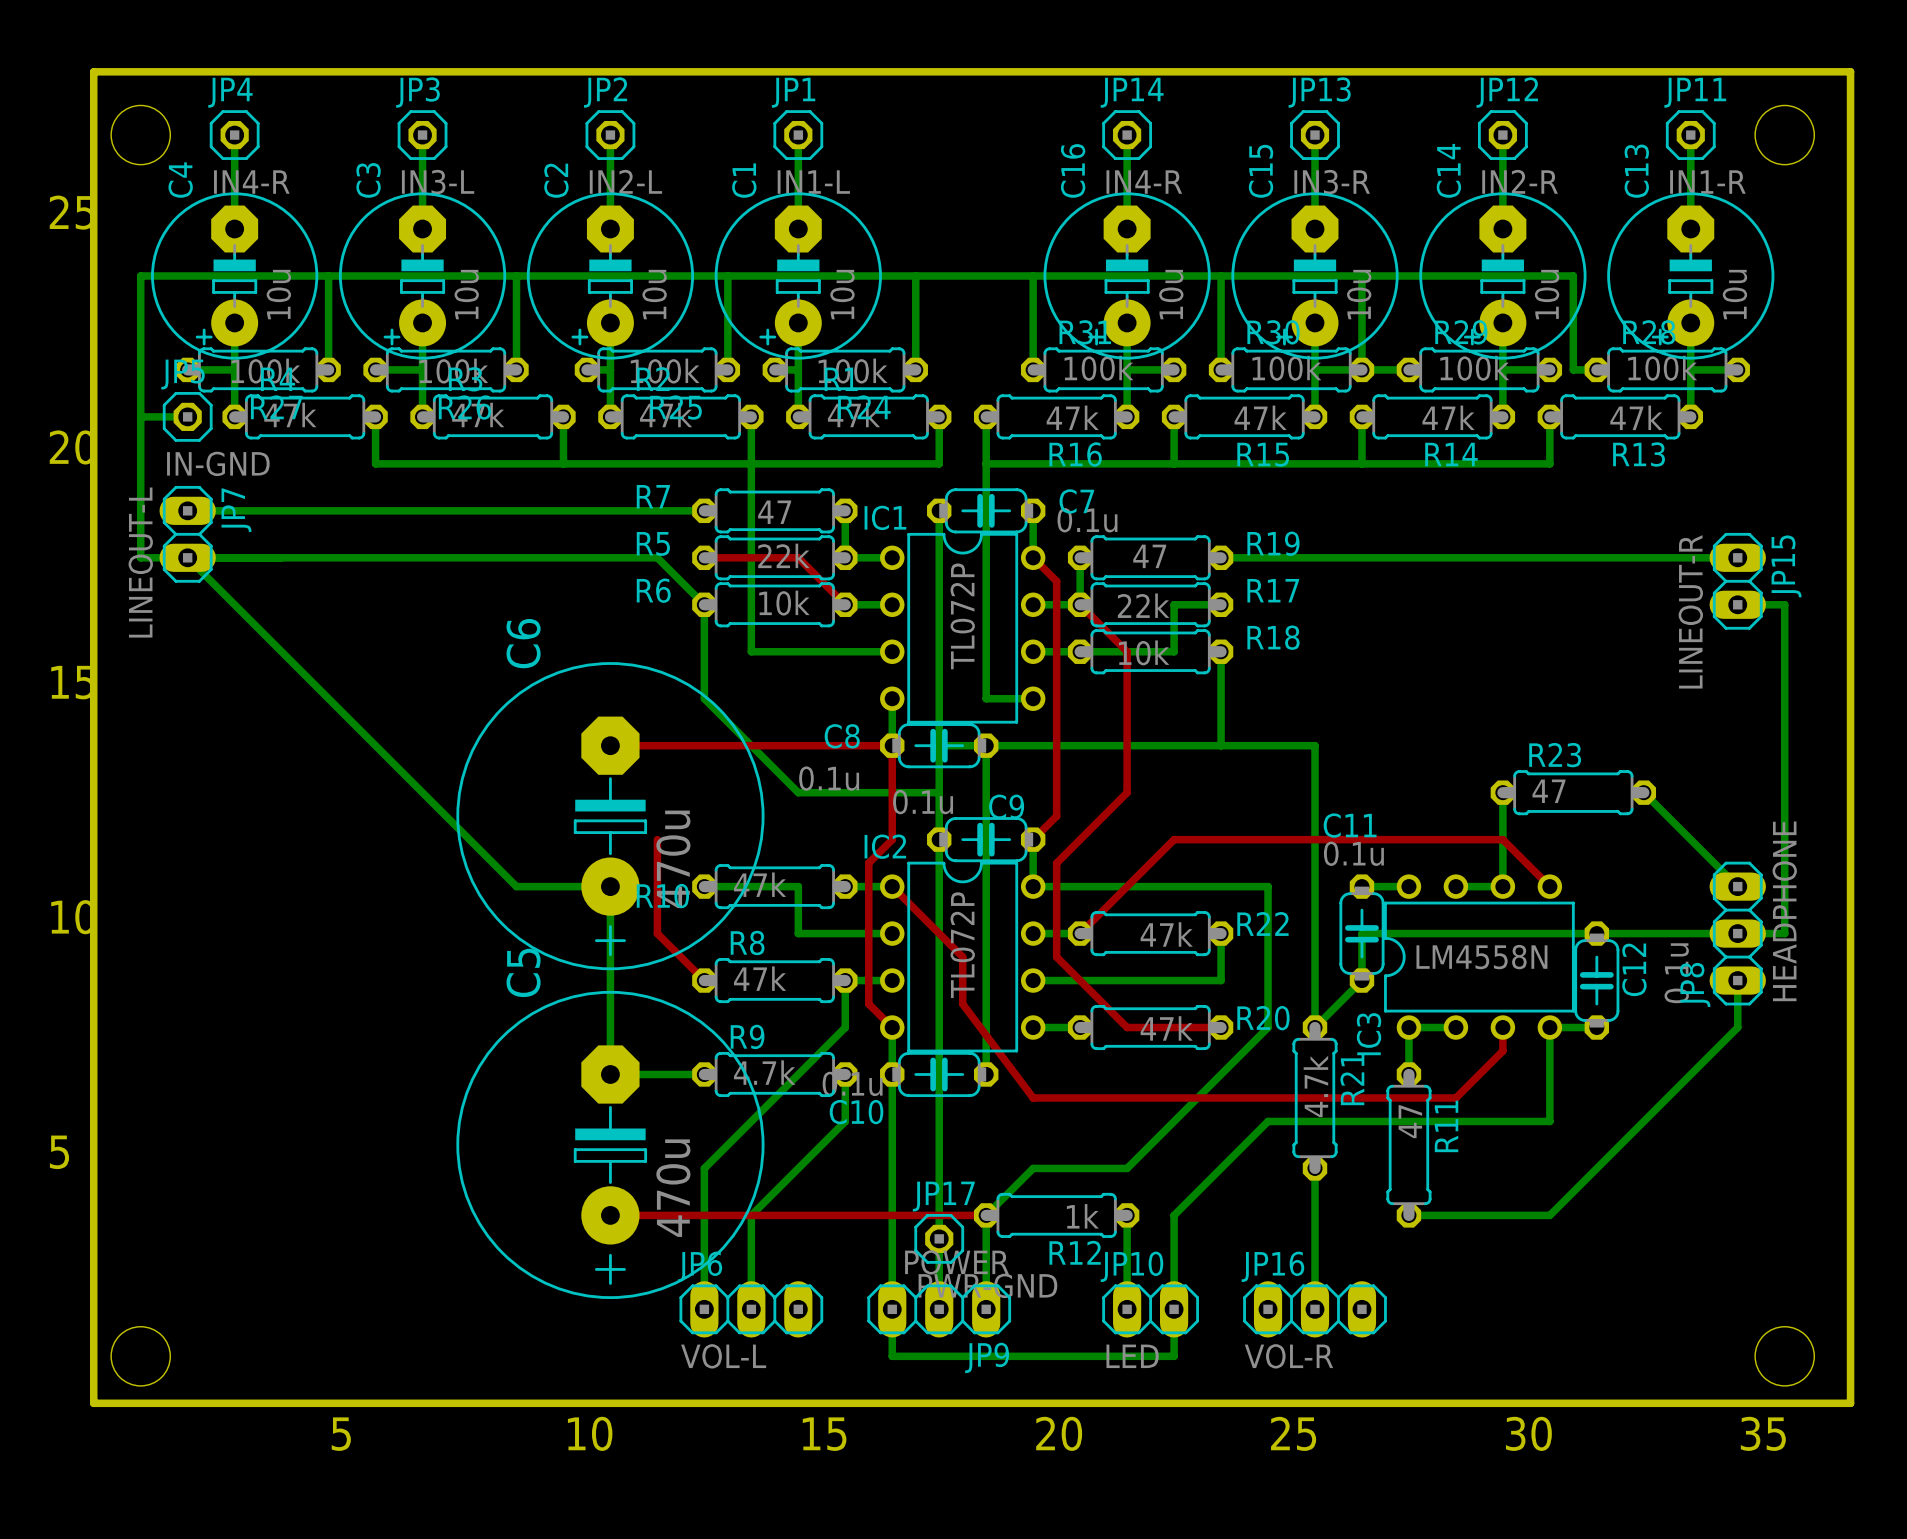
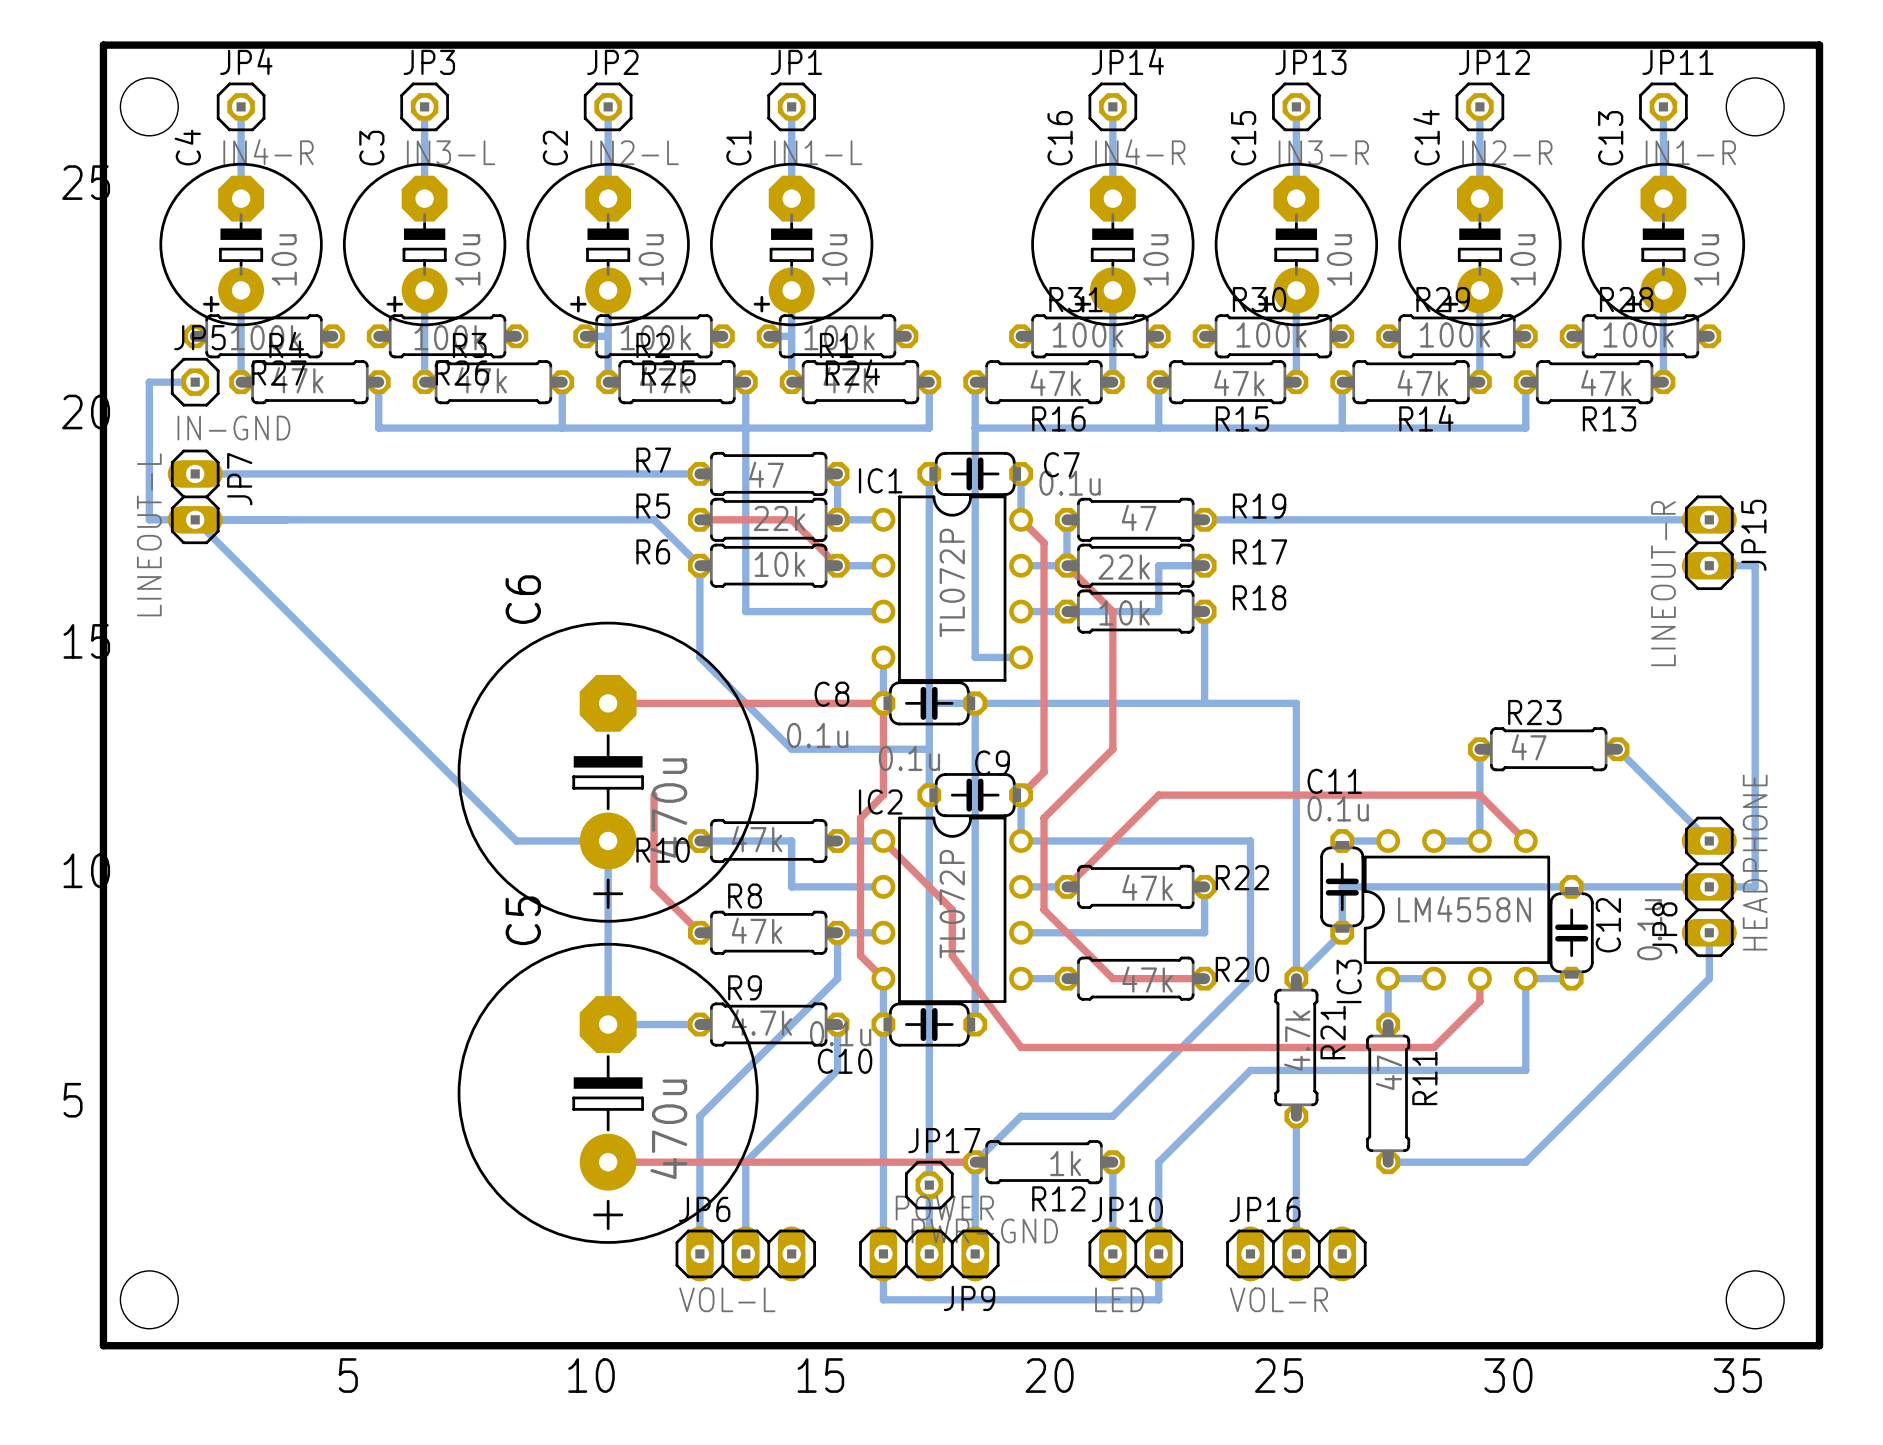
bottom track: (328, 275) (328, 369) -> none
bottom track: (516, 275) (516, 369) -> none
bottom track: (727, 275) (727, 369) -> none
bottom track: (915, 275) (915, 369) -> none
bottom track: (1033, 275) (1033, 369) -> none
bottom track: (1221, 275) (1221, 369) -> none
bottom track: (1361, 275) (1361, 369) -> none
bottom track: (187, 369) (234, 369) -> none
bottom track: (375, 369) (422, 369) -> none
bottom track: (1127, 369) (1174, 369) -> none
bottom track: (1315, 369) (1408, 369) -> none
bottom track: (1502, 369) (1549, 369) -> none
bottom track: (1596, 369) (1573, 369) (1573, 275) (140, 275) (140, 416) -> none
bottom track: (1690, 369) (1737, 369) -> none

